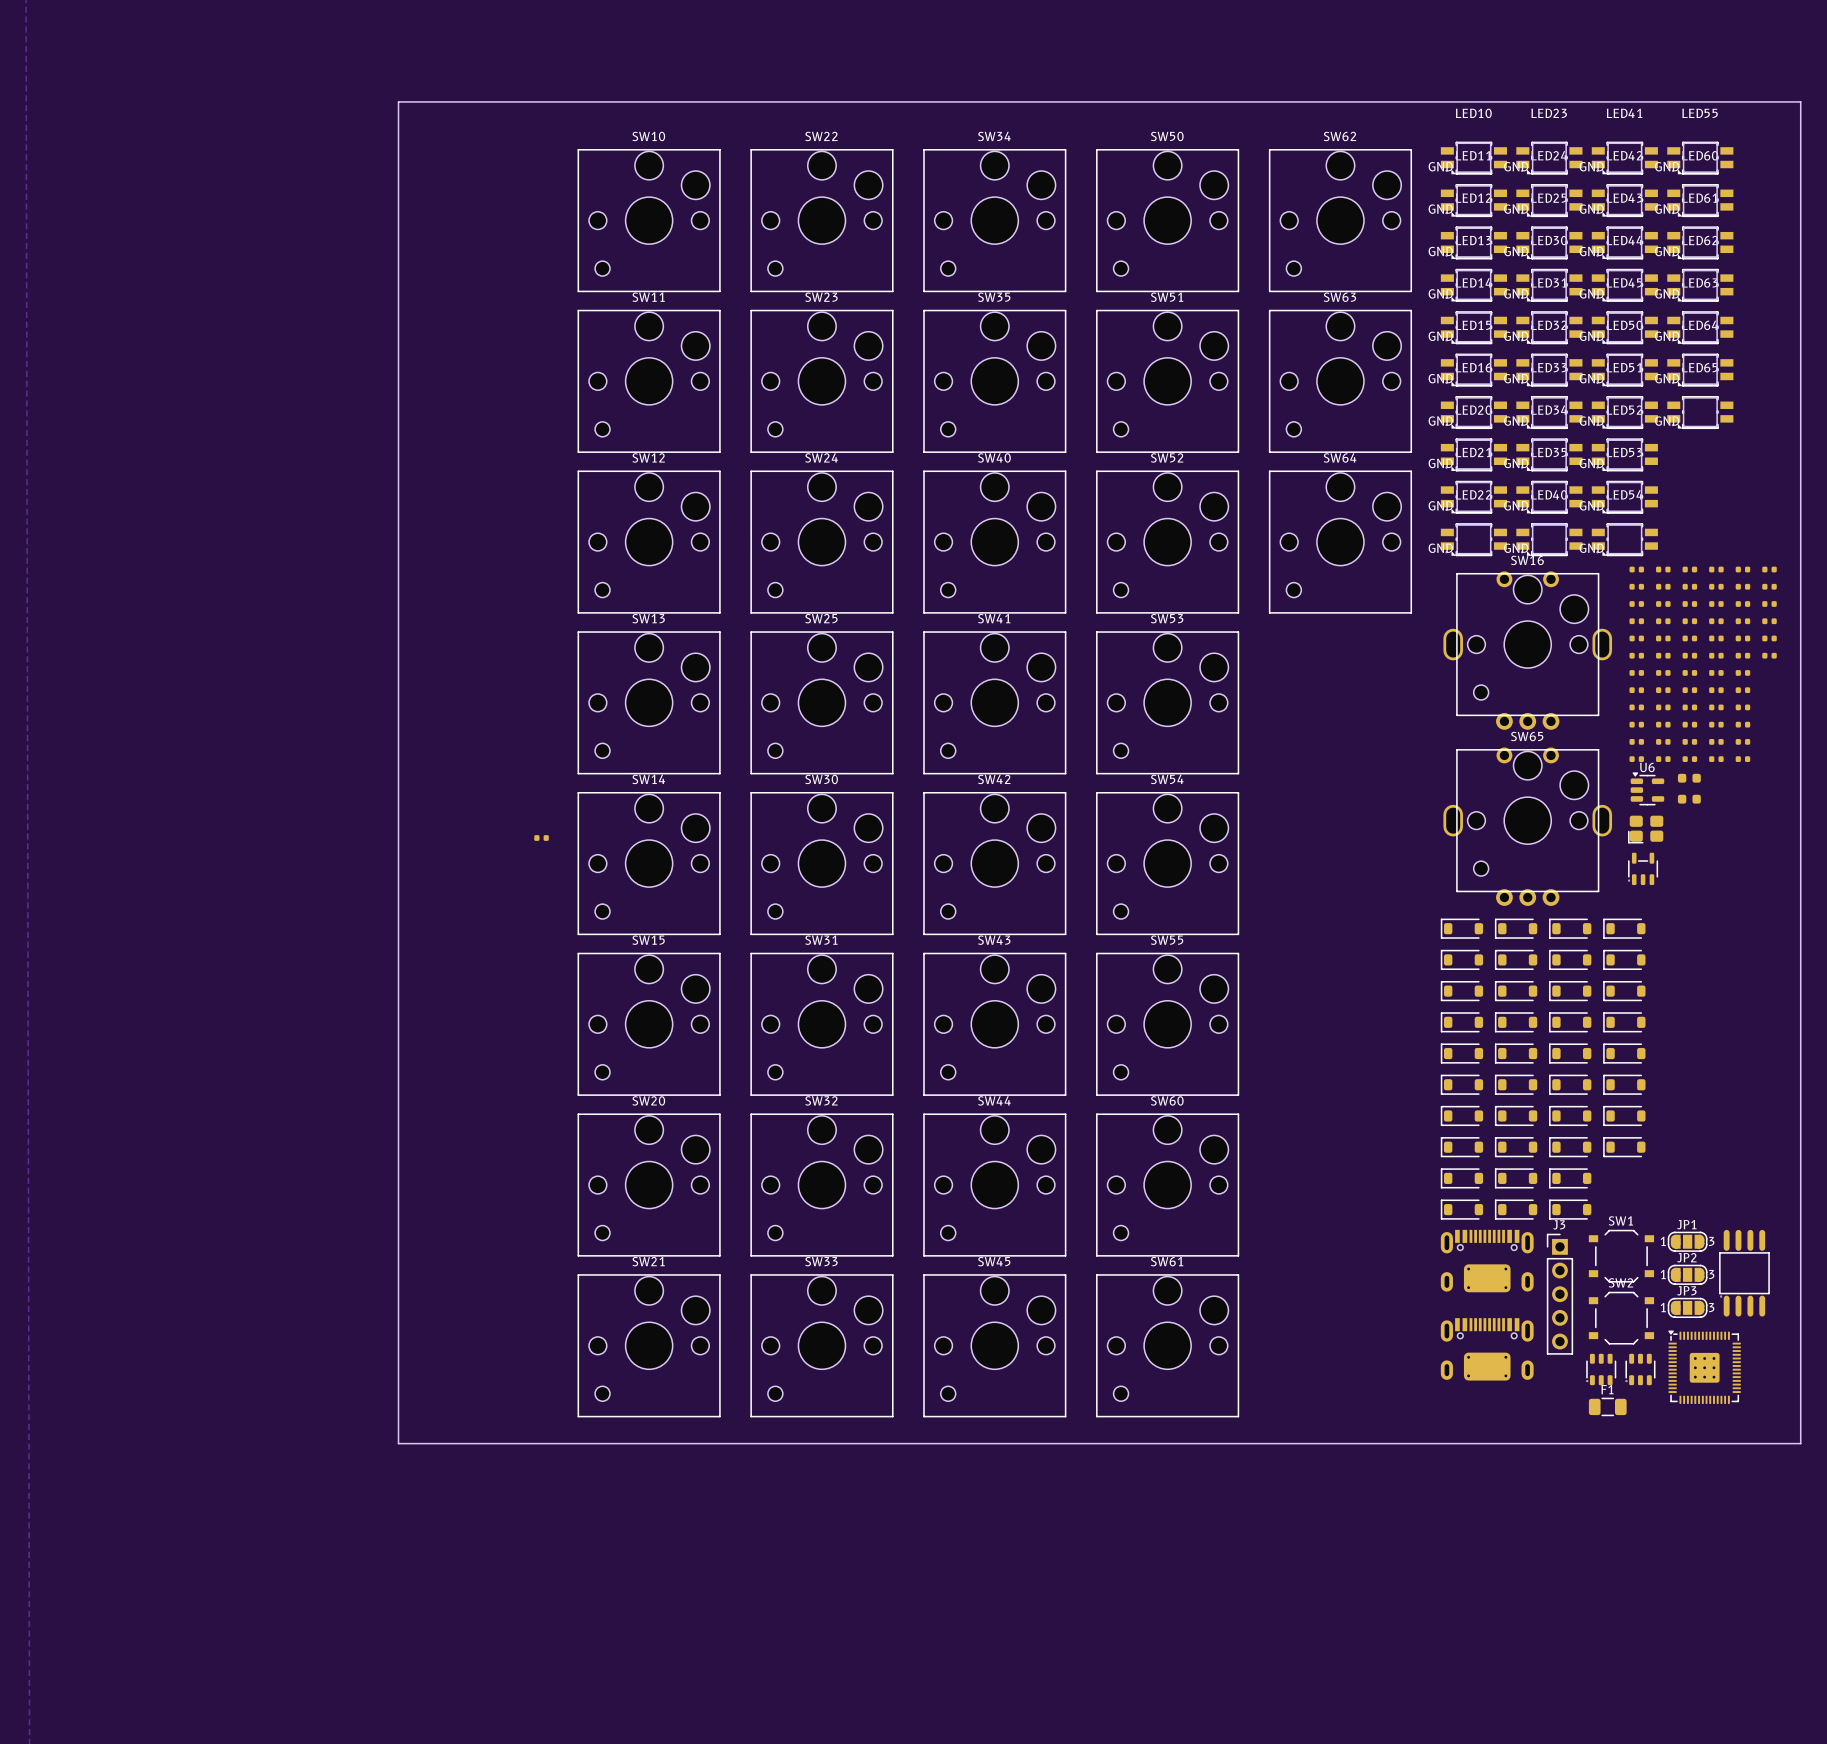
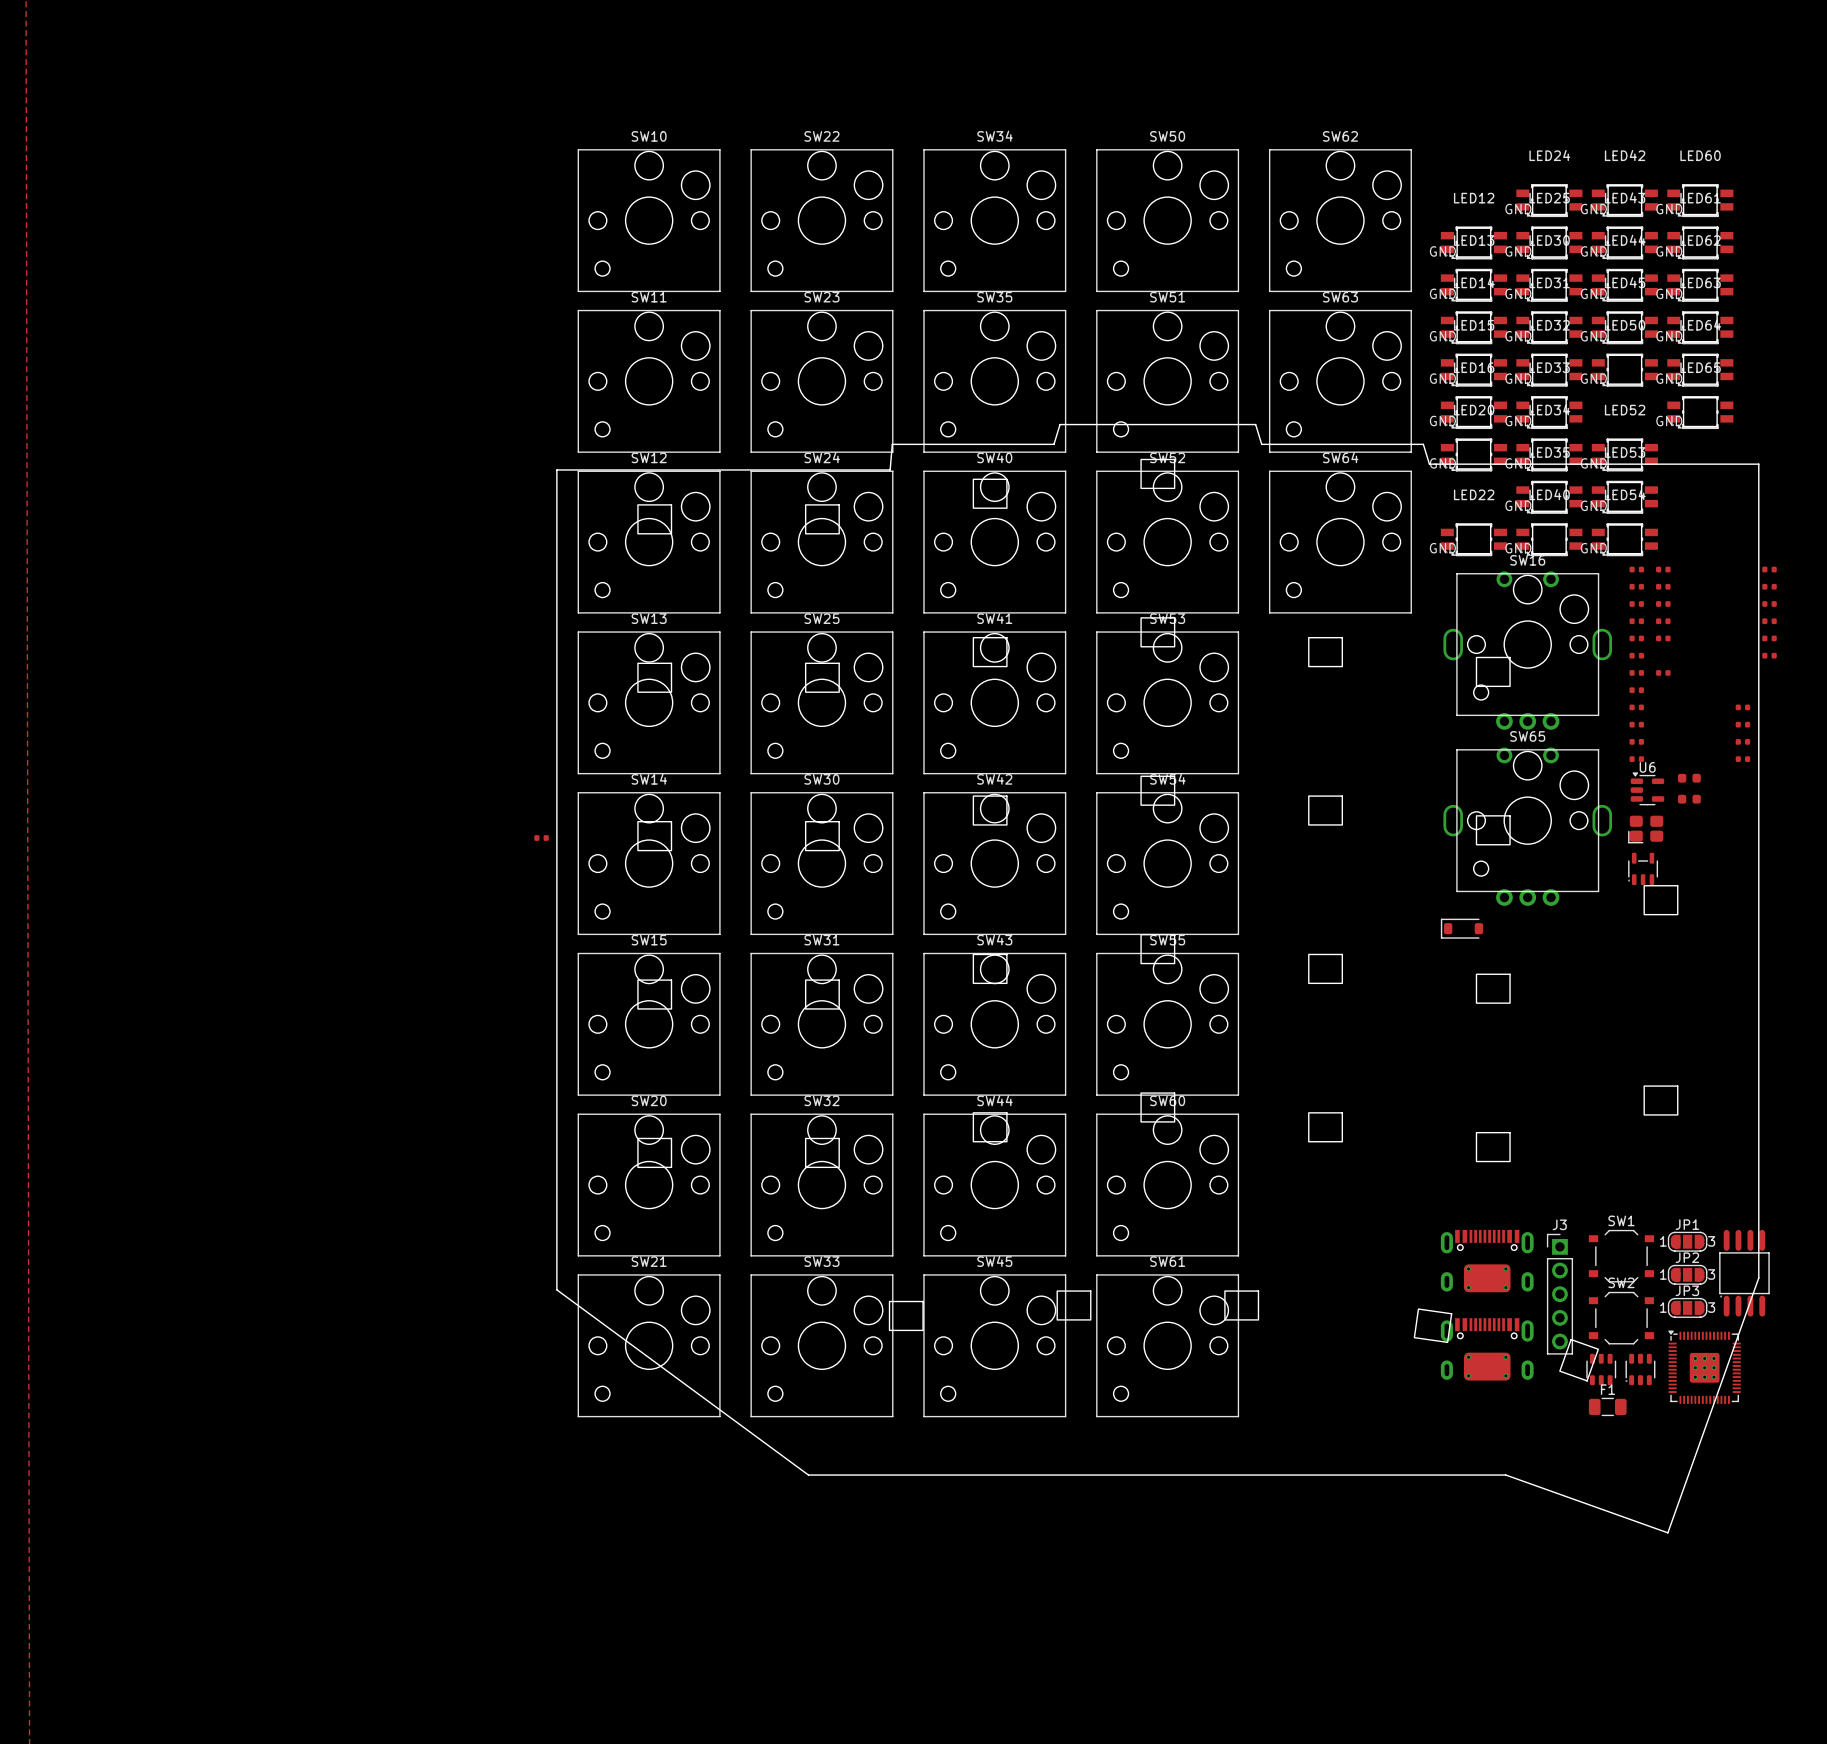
board edge: (398, 101) (1800, 101) (1800, 1443) (398, 1443) (398, 101) -> (1060, 424) (1053, 444) (892, 444) (890, 469) (556, 469) (556, 1289) (808, 1475) (1505, 1475) (1667, 1532) (1758, 1277) (1758, 464) (1429, 464) (1423, 444) (1261, 444) (1255, 424) (1060, 424)
LED10: (1473, 158) -> none
LED23: (1549, 158) -> none
LED41: (1624, 158) -> none
LED55: (1700, 158) -> none
LED11: (1473, 200) -> none
LED51: (1624, 412) -> none
part: none -> (1157, 473)
part: none -> (990, 493)
LED21: (1473, 497) -> none
part: none -> (654, 519)
part: none -> (822, 519)
part: (1689, 569) -> none
part: (1716, 569) -> none
part: (1742, 569) -> none
part: (1689, 586) -> none
part: (1716, 586) -> none
part: (1742, 586) -> none
part: (1689, 603) -> none
part: (1716, 603) -> none
part: (1742, 603) -> none
part: (1689, 621) -> none
part: (1716, 621) -> none
part: (1742, 621) -> none
part: none -> (1157, 632)
part: (1689, 638) -> none
part: (1716, 638) -> none
part: (1742, 638) -> none
part: none -> (990, 652)
part: none -> (1325, 652)
part: (1663, 655) -> none
part: (1689, 655) -> none
part: (1716, 655) -> none
part: (1742, 655) -> none
part: none -> (1493, 671)
part: (1689, 672) -> none
part: (1716, 672) -> none
part: (1742, 672) -> none
part: none -> (654, 677)
part: none -> (822, 677)
part: (1663, 690) -> none
part: (1689, 690) -> none
part: (1716, 690) -> none
part: (1742, 690) -> none
part: (1663, 707) -> none
part: (1689, 707) -> none
part: (1716, 707) -> none
part: (1663, 724) -> none
part: (1689, 724) -> none
part: (1716, 724) -> none
part: (1663, 741) -> none
part: (1689, 741) -> none
part: (1716, 741) -> none
part: (1663, 759) -> none
part: (1689, 759) -> none
part: (1716, 759) -> none
part: none -> (1157, 790)
part: none -> (990, 810)
part: none -> (1325, 810)
part: none -> (1493, 830)
part: none -> (654, 836)
part: none -> (822, 836)
part: none -> (1660, 900)
part: (1516, 928) -> none
part: (1570, 928) -> none
part: (1624, 928) -> none
part: none -> (1157, 949)
part: (1461, 959) -> none
part: (1516, 959) -> none
part: (1570, 959) -> none
part: (1624, 959) -> none
part: none -> (990, 968)
part: none -> (1325, 968)
part: none -> (1493, 988)
part: (1461, 991) -> none
part: (1516, 991) -> none
part: (1570, 991) -> none
part: (1624, 991) -> none
part: none -> (654, 994)
part: none -> (822, 994)
part: (1461, 1022) -> none
part: (1516, 1022) -> none
part: (1570, 1022) -> none
part: (1624, 1022) -> none
part: (1461, 1053) -> none
part: (1516, 1053) -> none
part: (1570, 1053) -> none
part: (1624, 1053) -> none
part: (1461, 1084) -> none
part: (1516, 1084) -> none
part: (1570, 1084) -> none
part: (1624, 1084) -> none
part: none -> (1660, 1100)
part: none -> (1157, 1107)
part: (1461, 1115) -> none
part: (1516, 1115) -> none
part: (1570, 1115) -> none
part: (1624, 1115) -> none
part: none -> (990, 1127)
part: none -> (1325, 1127)
part: (1461, 1147) -> none
part: none -> (1493, 1147)
part: (1516, 1147) -> none
part: (1570, 1147) -> none
part: (1624, 1147) -> none
part: none -> (654, 1152)
part: none -> (822, 1152)
part: (1461, 1178) -> none
part: (1516, 1178) -> none
part: (1570, 1178) -> none
part: (1461, 1209) -> none
part: (1516, 1209) -> none
part: (1570, 1209) -> none
part: none -> (1073, 1305)
part: none -> (1241, 1305)
part: none -> (906, 1315)
part: none -> (1433, 1325)
part: none -> (1579, 1360)

